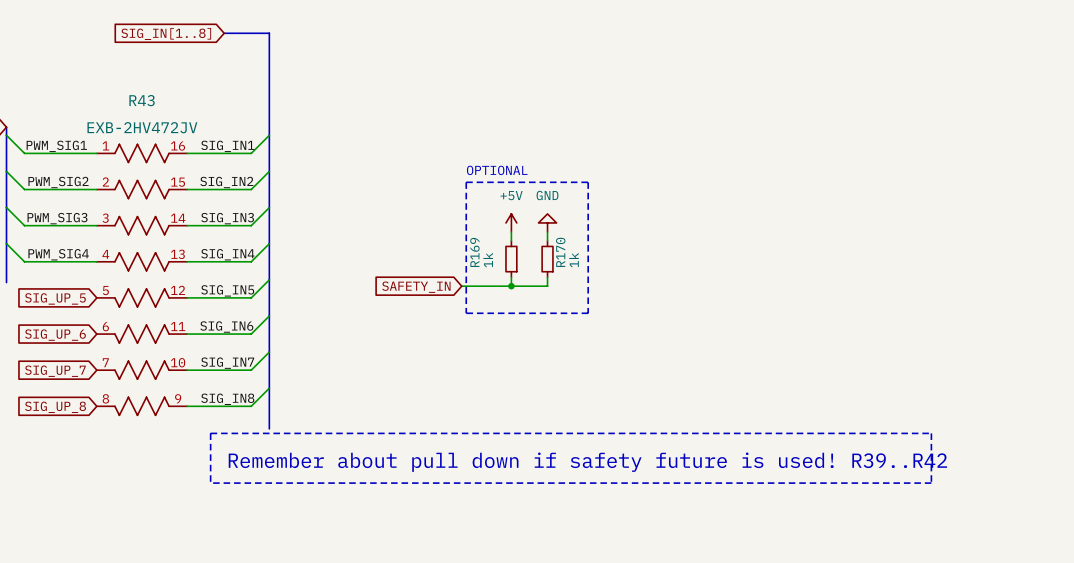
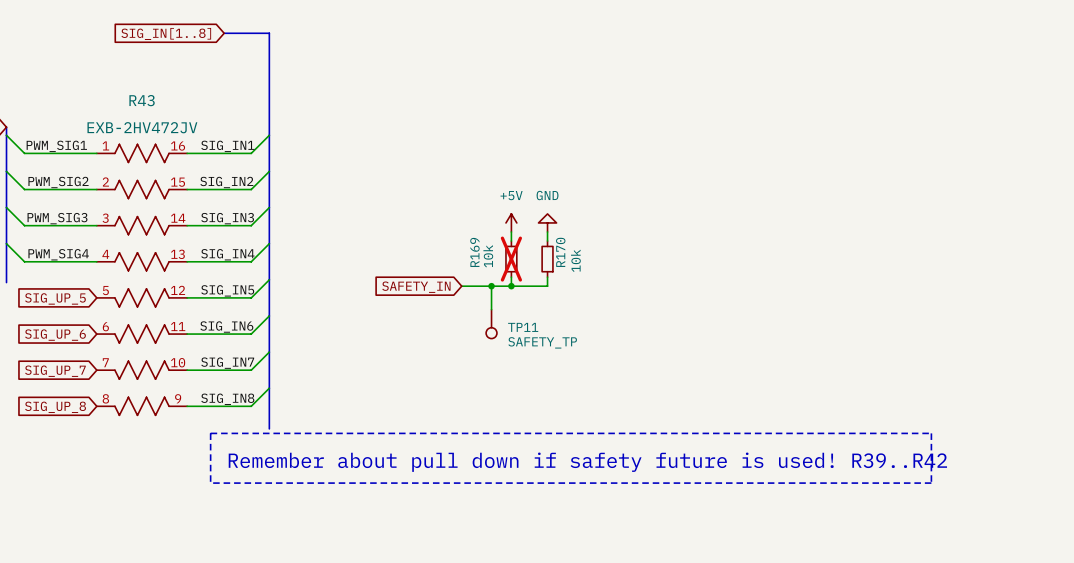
text: OPTIONAL (497, 170) -> none
line: (466, 182) (588, 182) (588, 313) (466, 313) (466, 182) -> none
R169 do-not-place cross: none -> (511, 259)
R169 value: 1k (488, 260) -> 10k (488, 256)
R170 value: 1k (574, 260) -> 10k (575, 260)
wire: none -> (491, 286) (491, 309)
junction: none -> (491, 286)
TP11: none -> SAFETY_TP (491, 324)

